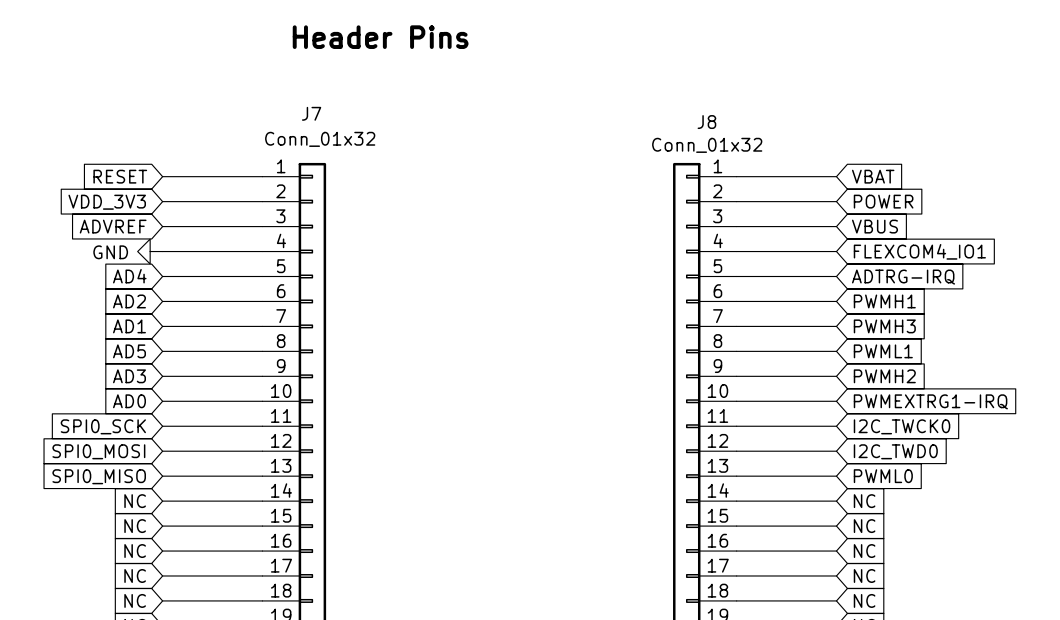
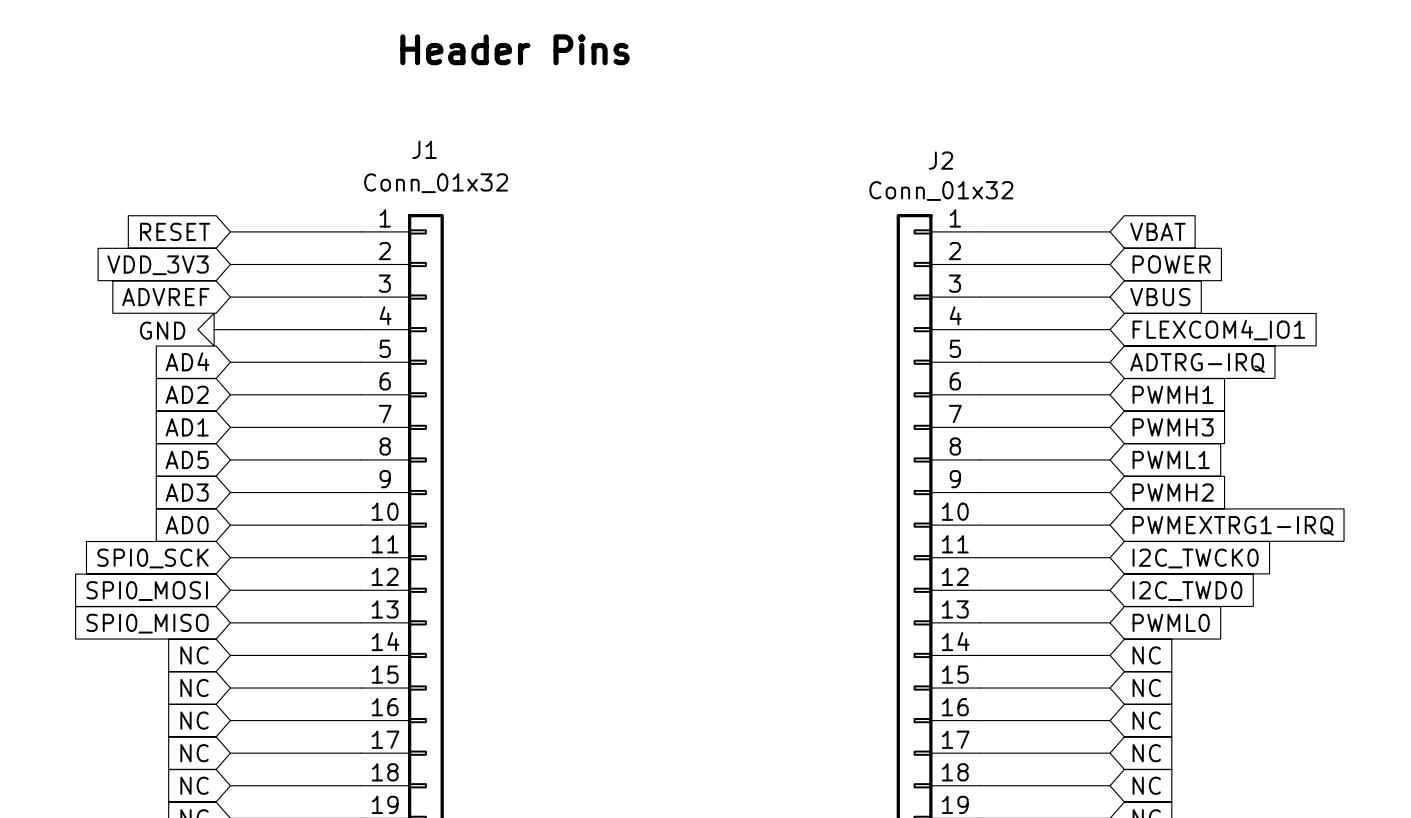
J7 name: J7 (311, 113) -> J1 (424, 149)
J8 name: J8 (706, 122) -> J2 (940, 160)

